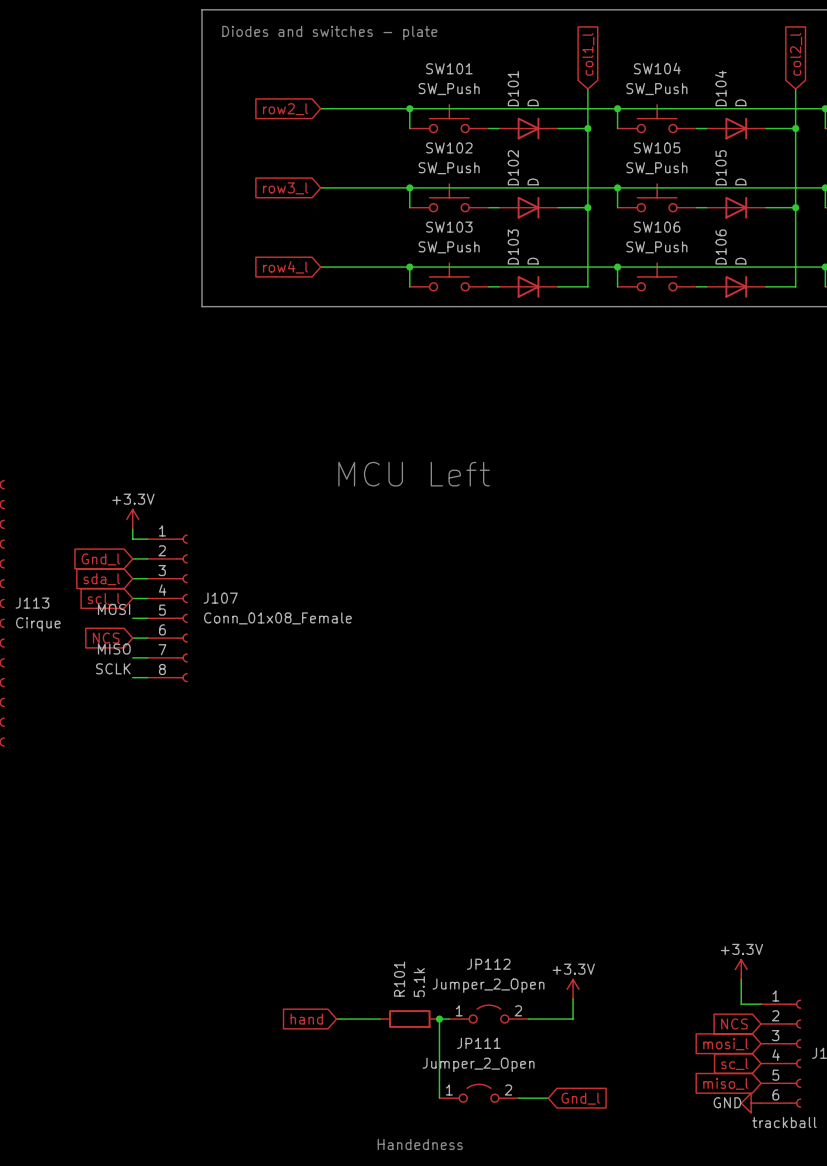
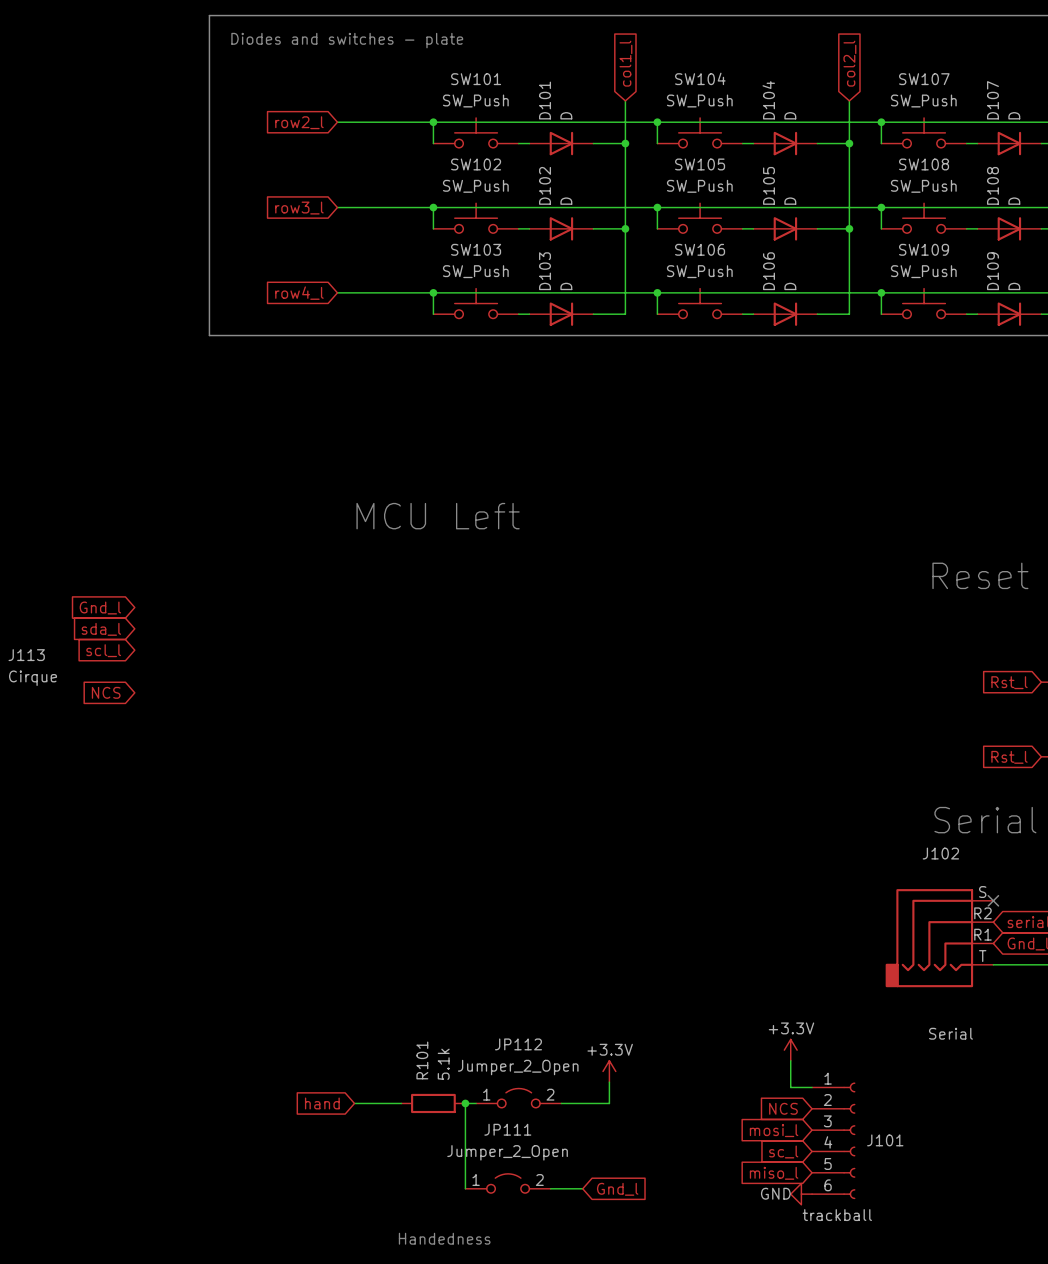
power symbol: +3.3V (132, 519) -> none
wire: (132, 529) (132, 539) (147, 539) -> none
wire: (132, 558) (147, 558) -> none
wire: (132, 578) (147, 578) -> none
wire: (132, 598) (147, 598) -> none
J107: Conn_01x08_Female (167, 608) -> none
label: MOSI (114, 609) -> none
wire: (132, 618) (147, 618) -> none
wire: (132, 638) (147, 638) -> none
label: MISO (114, 649) -> none
wire: (132, 657) (147, 657) -> none
label: SCLK (113, 668) -> none
wire: (132, 677) (147, 677) -> none

